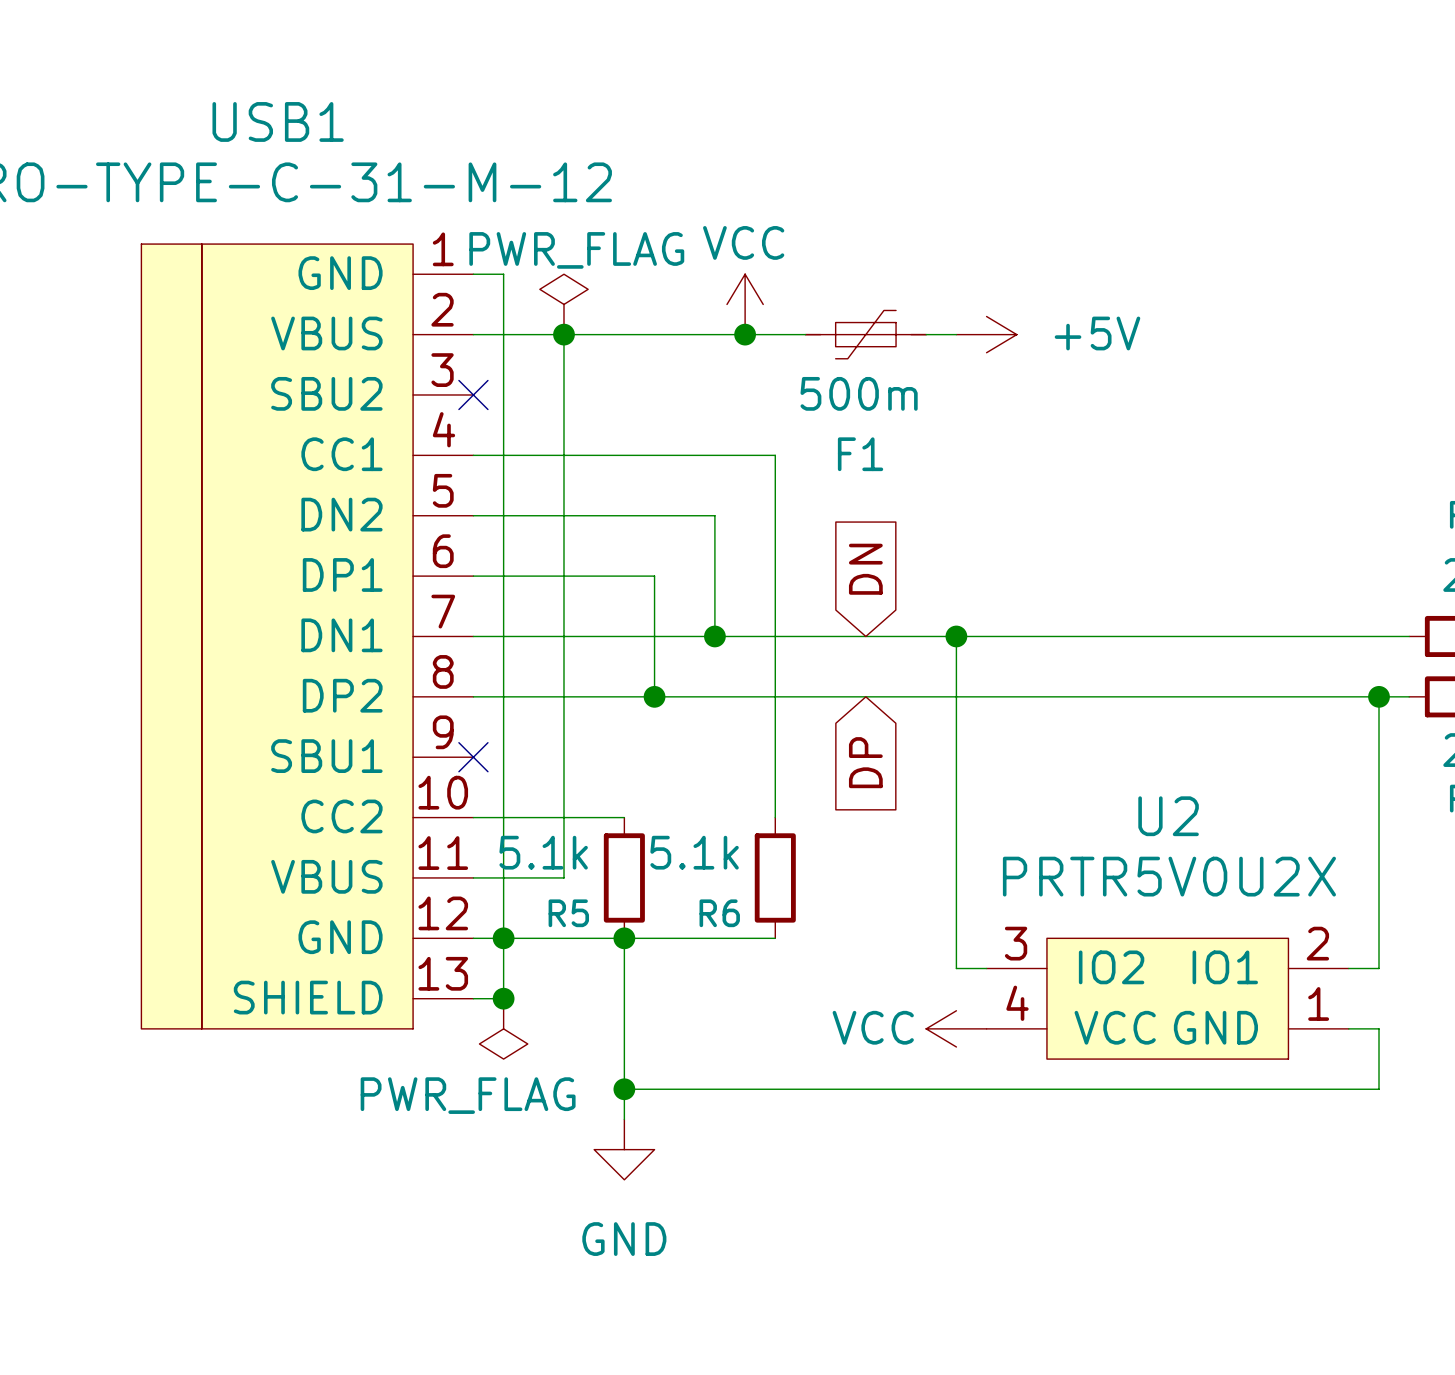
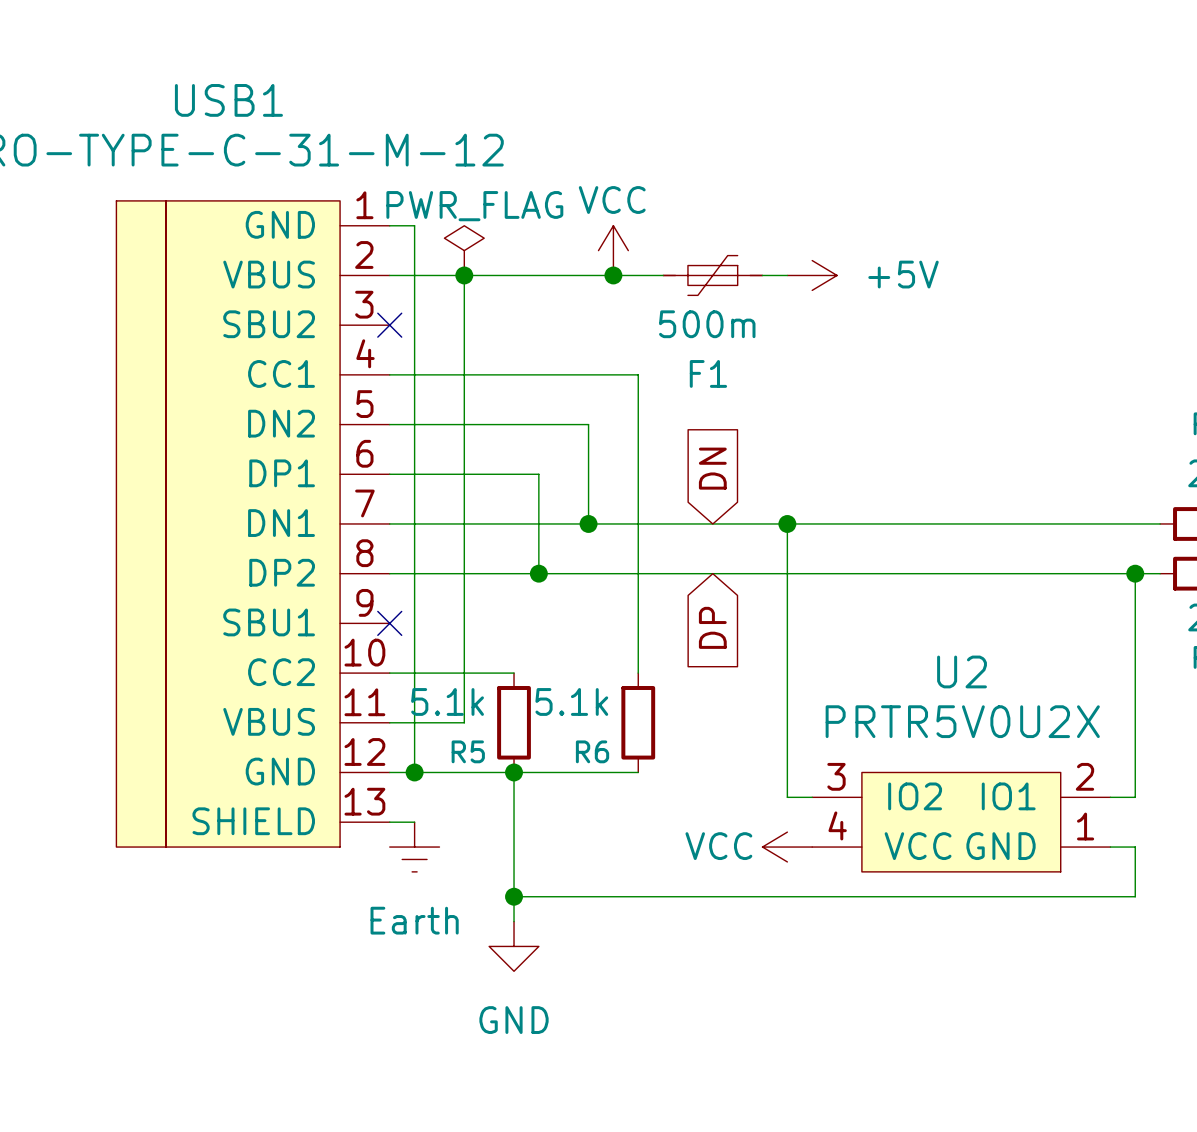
wire: (503, 938) (503, 998) -> none
junction: (503, 998) -> none
power symbol: PWR_FLAG (503, 1028) -> Earth (414, 847)

